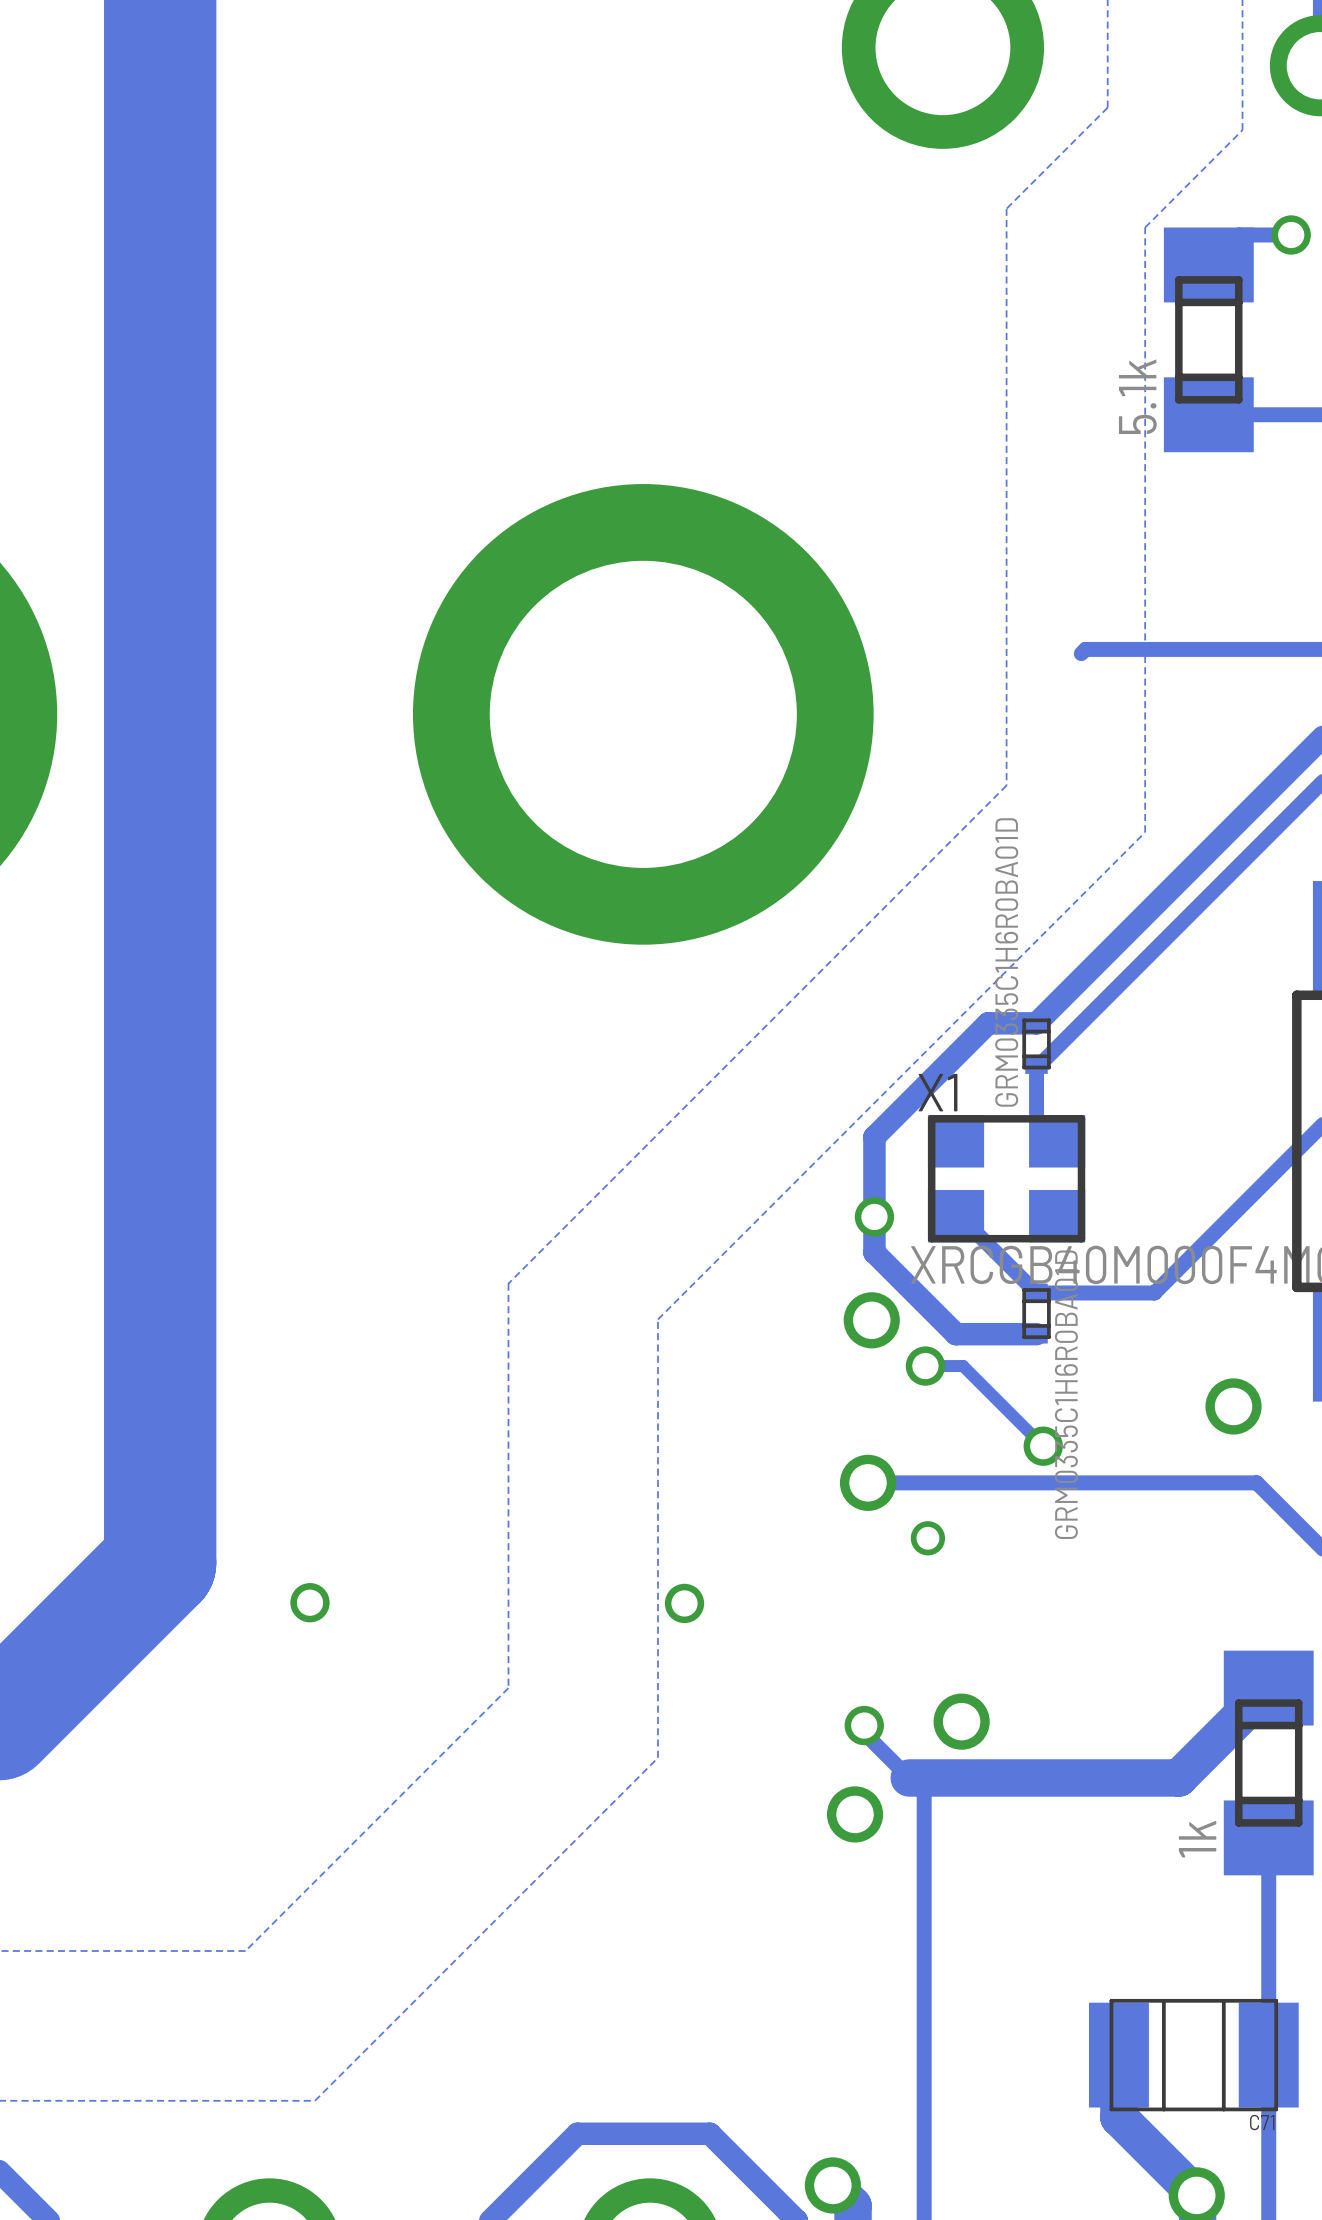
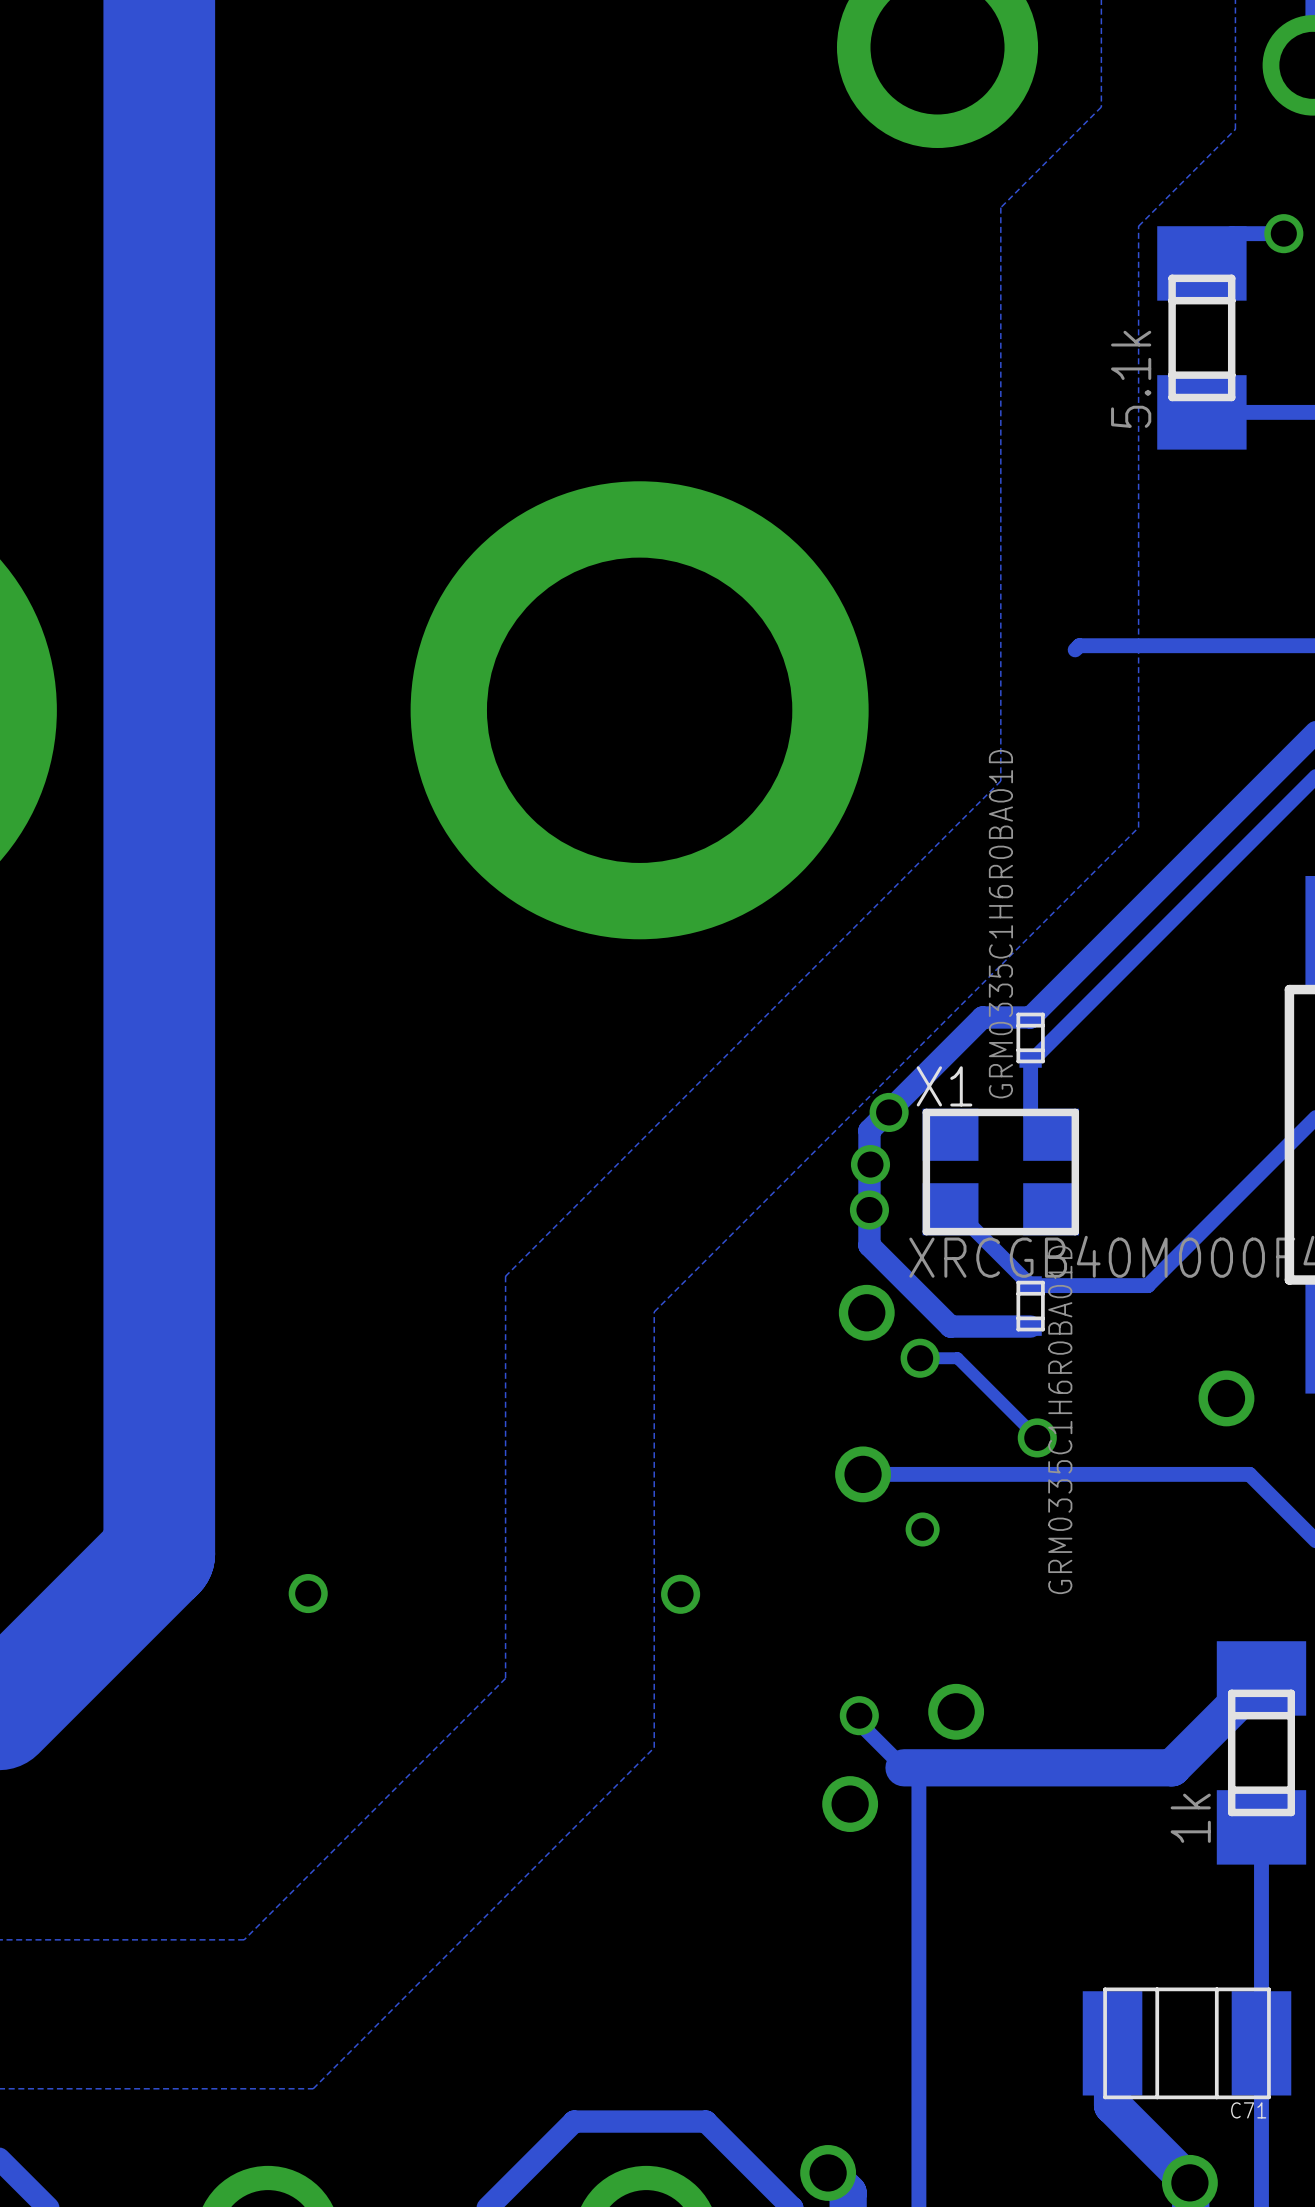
via: none -> (889, 1112)
via: none -> (870, 1164)

